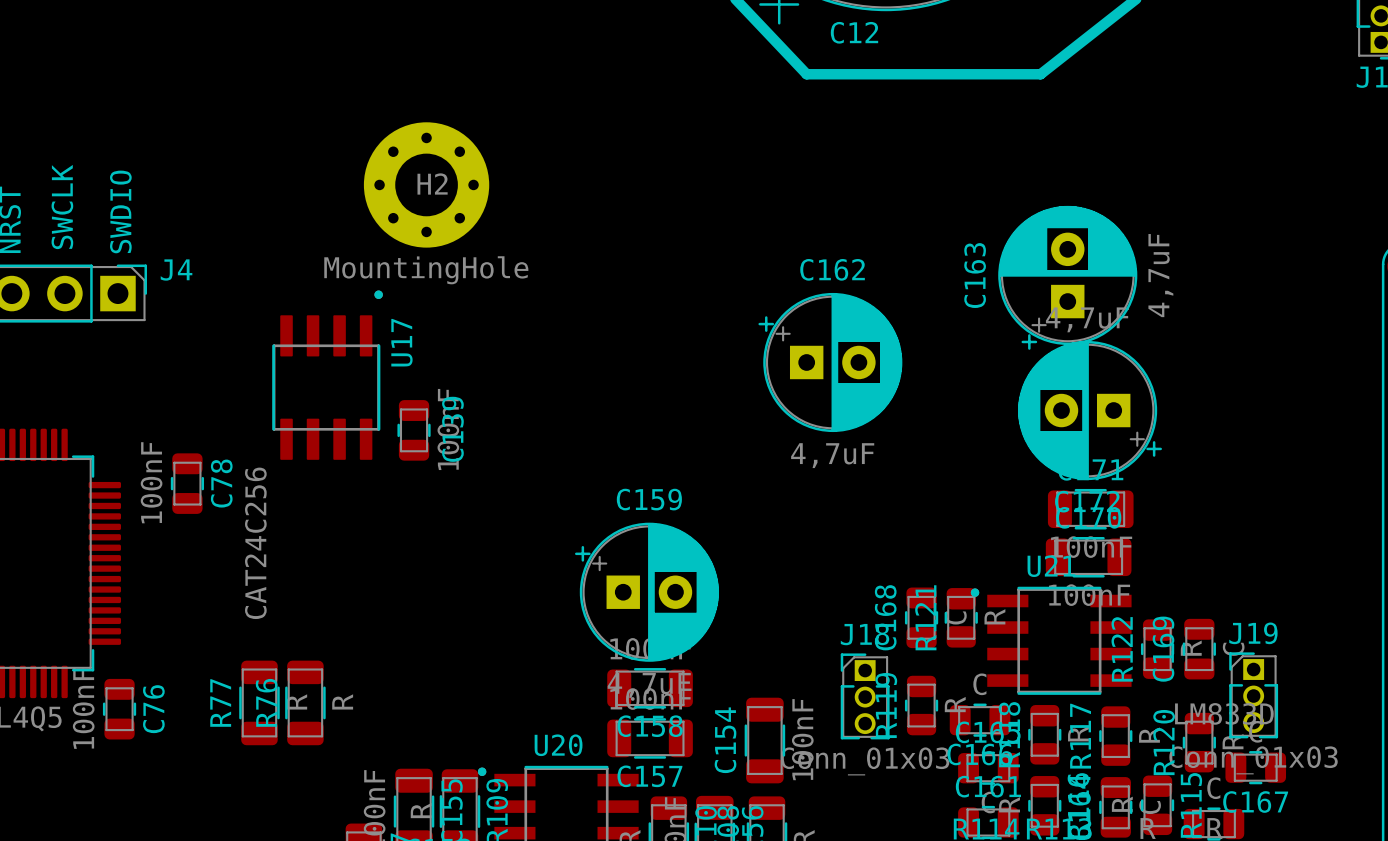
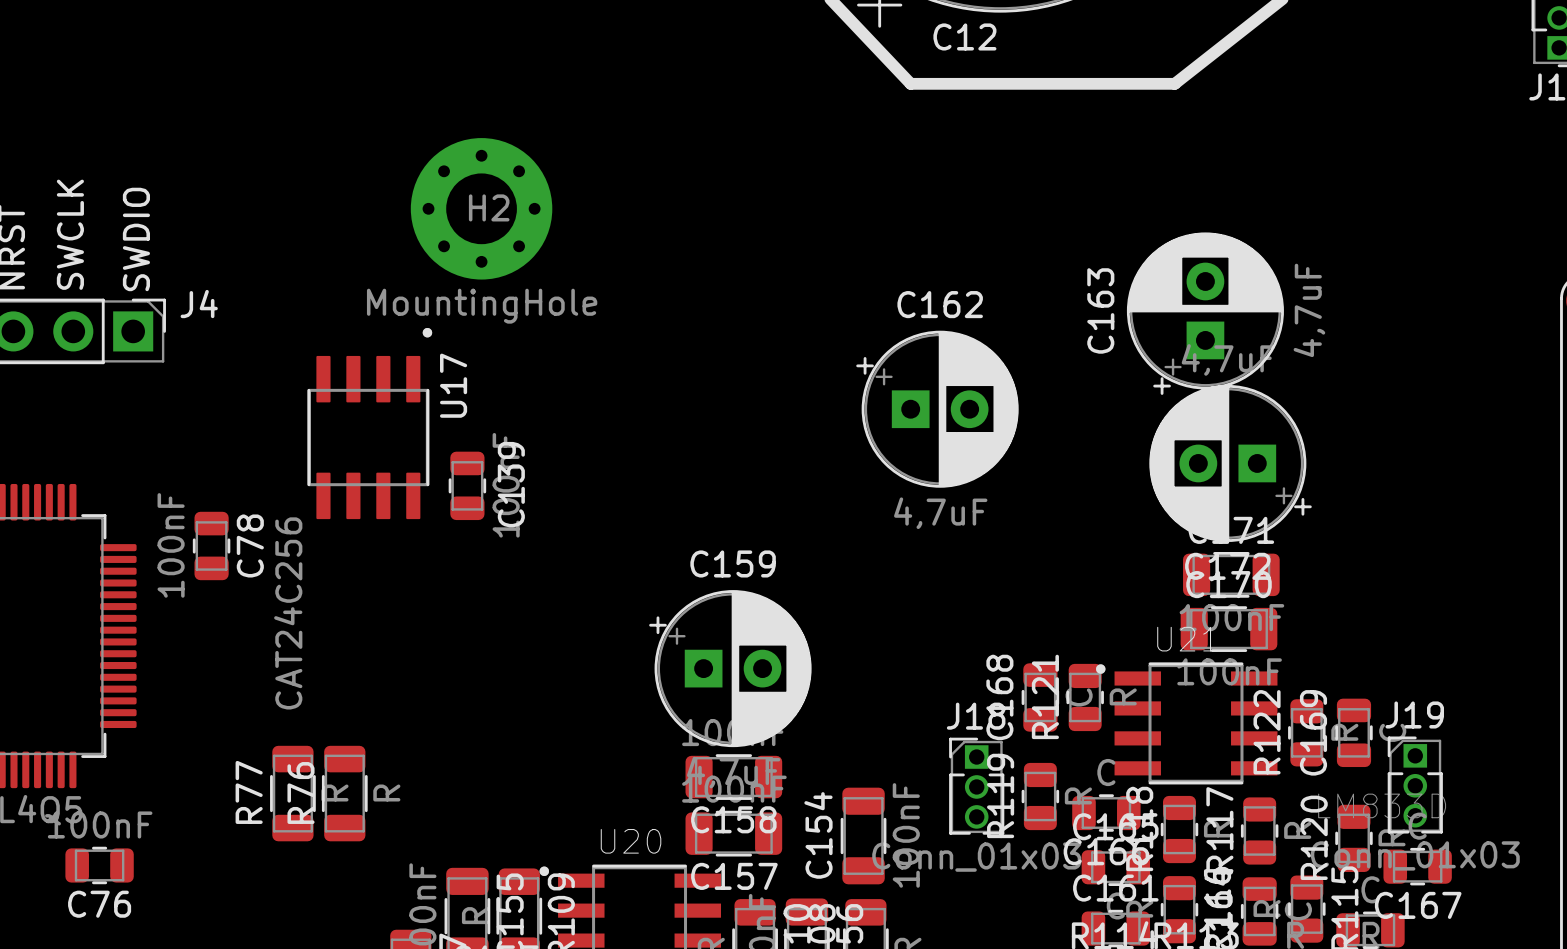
C76 rotation: 0° (119, 709) -> 90° clockwise (99, 865)
C76 position: (119, 709) -> (99, 865)

